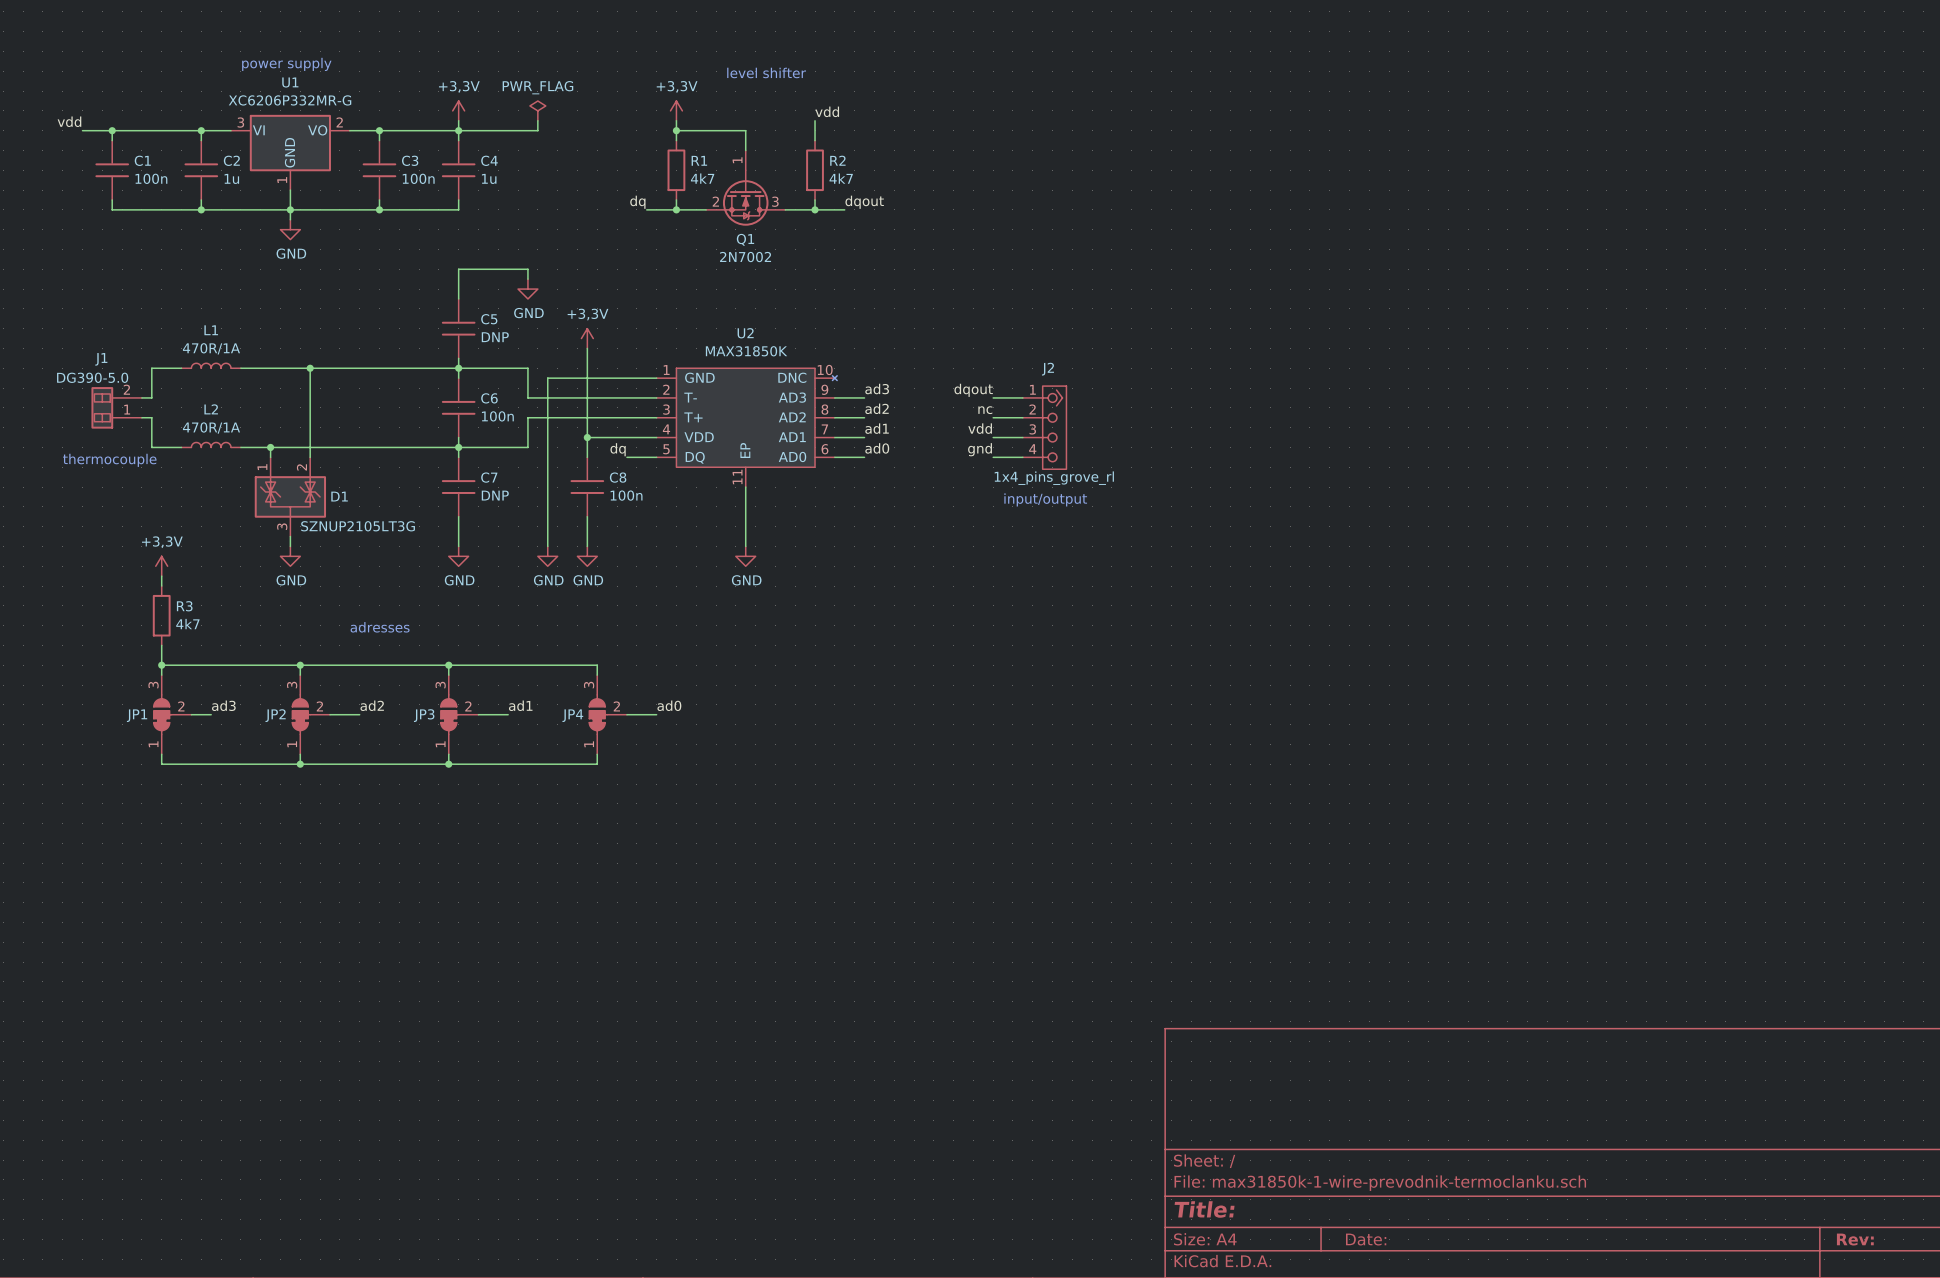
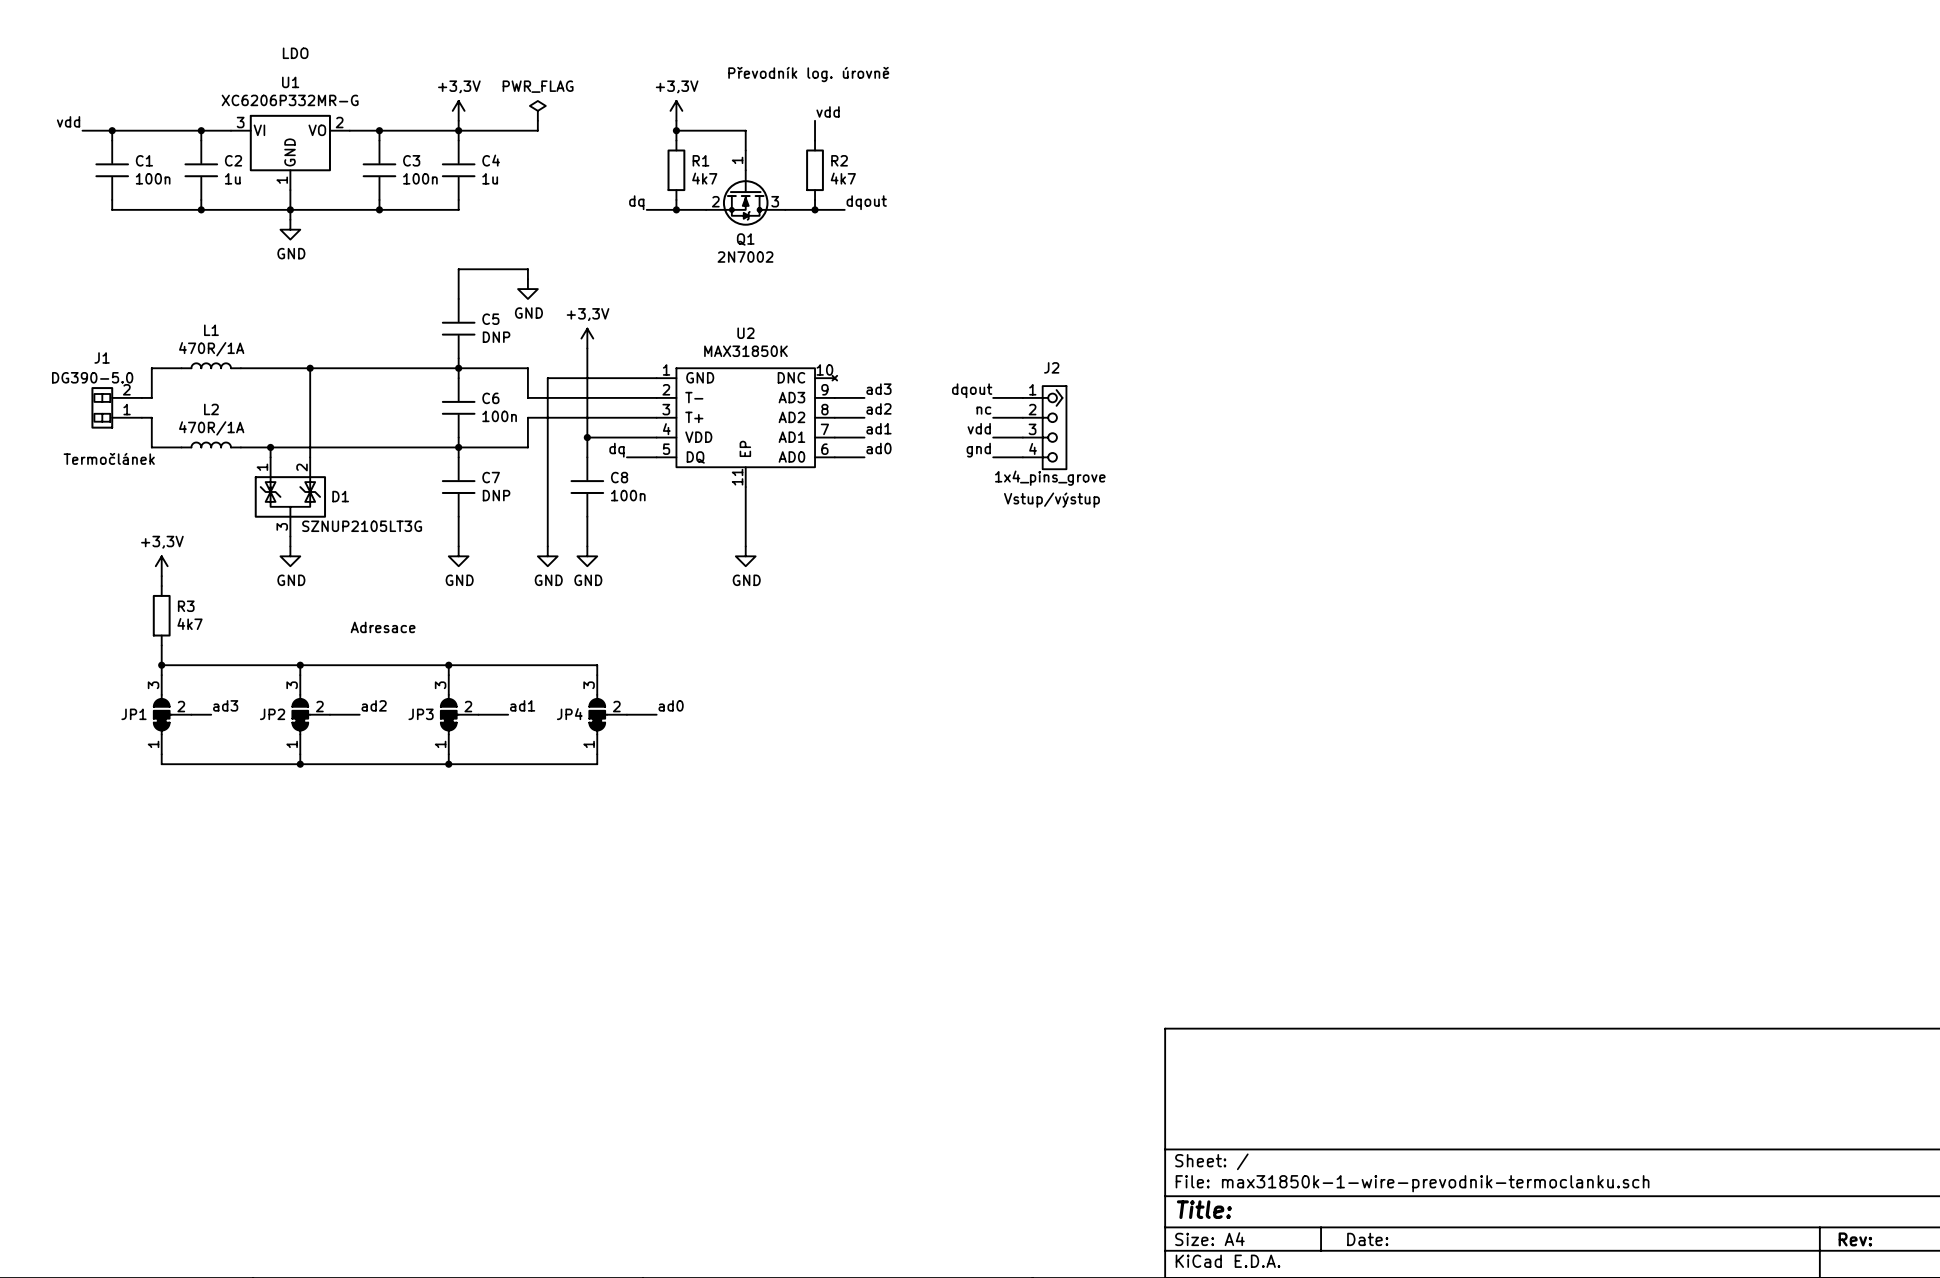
text: none -> LDO (295, 53)
text: power supply (286, 64) -> none
text: level shifter (766, 72) -> Převodník log. úrovně (808, 74)
text: thermocouple (109, 460) -> Termočlánek (109, 458)
J2 value: 1x4_pins_grove_rl (1054, 478) -> 1x4_pins_grove (1050, 478)
text: input/output (1045, 499) -> Vstup/výstup (1051, 500)
text: adresses (380, 627) -> Adresace (383, 627)

